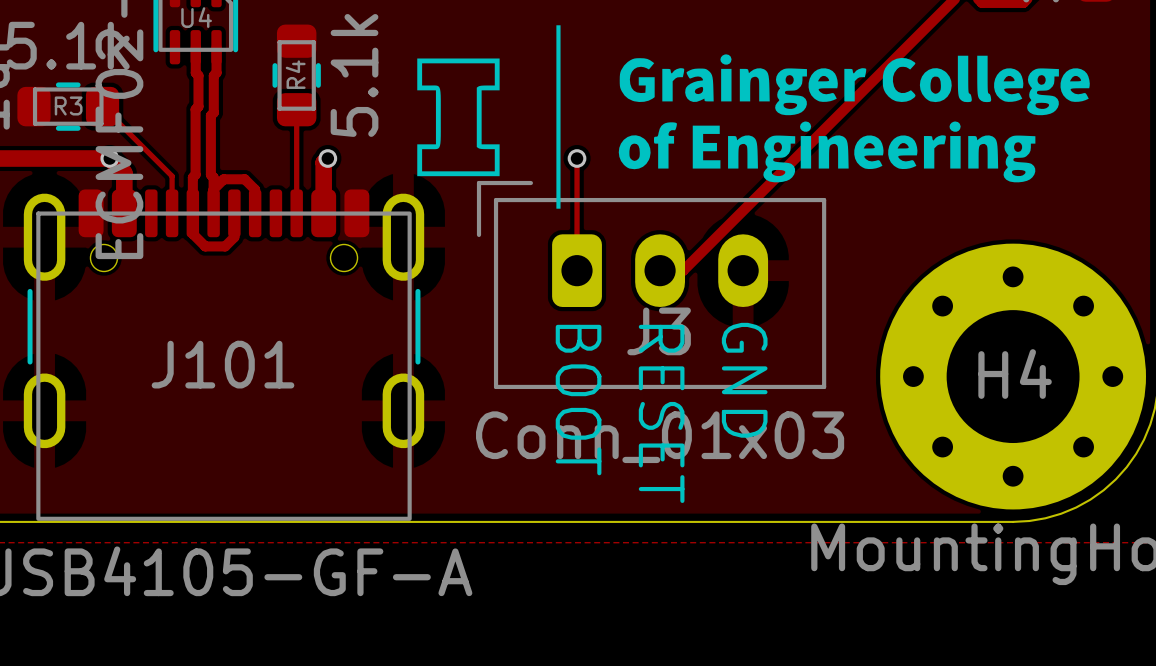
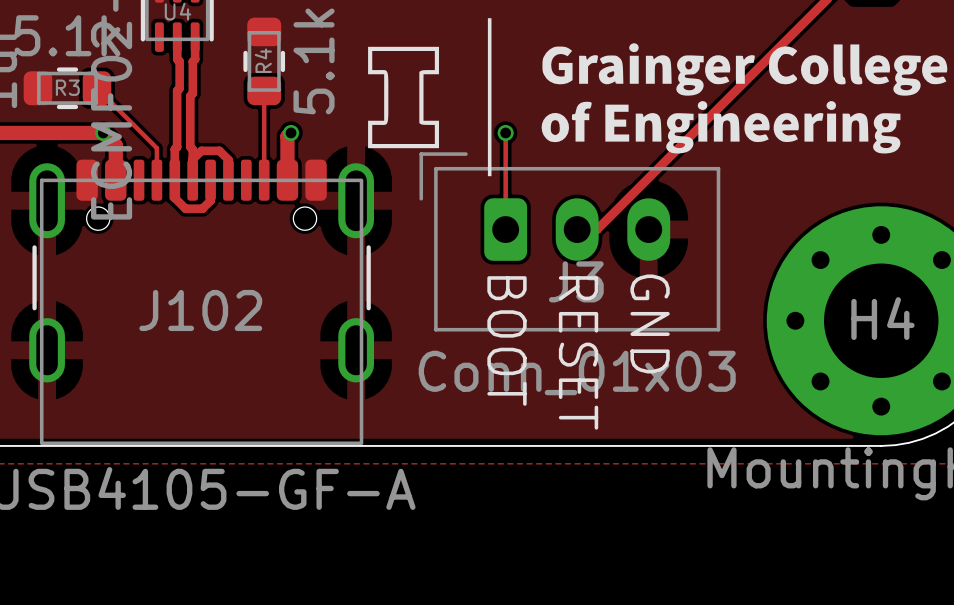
J101 name: J101 (223, 364) -> J102 (200, 310)

